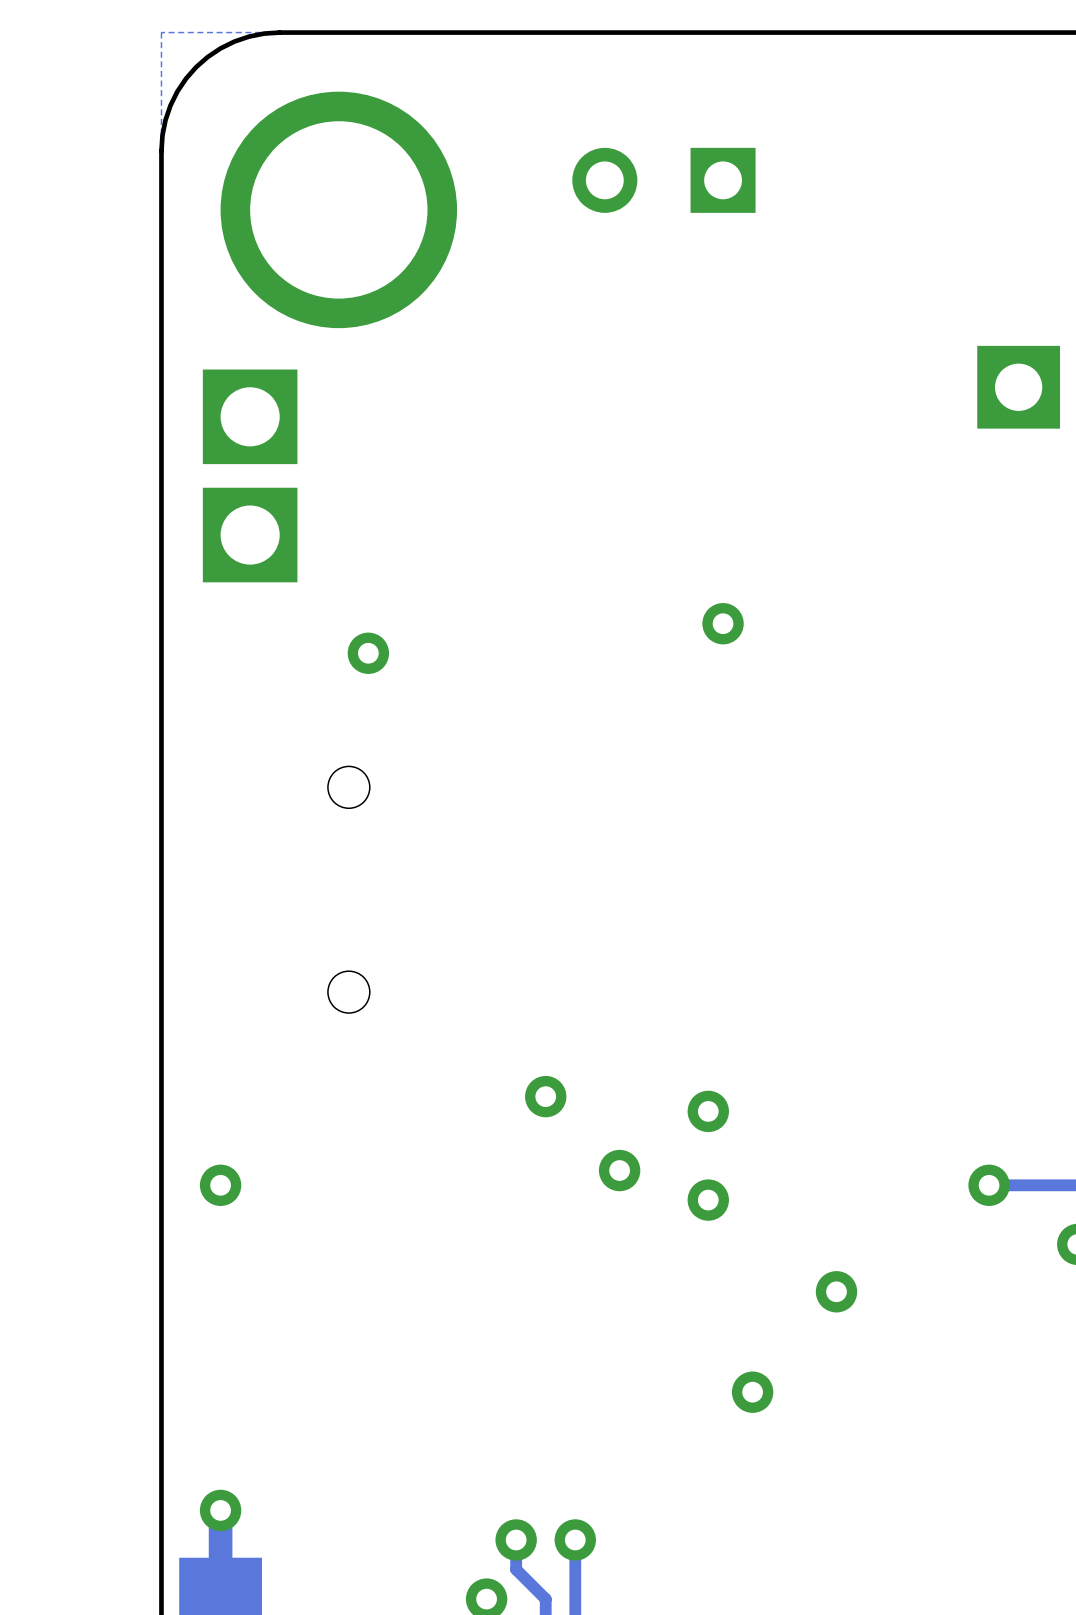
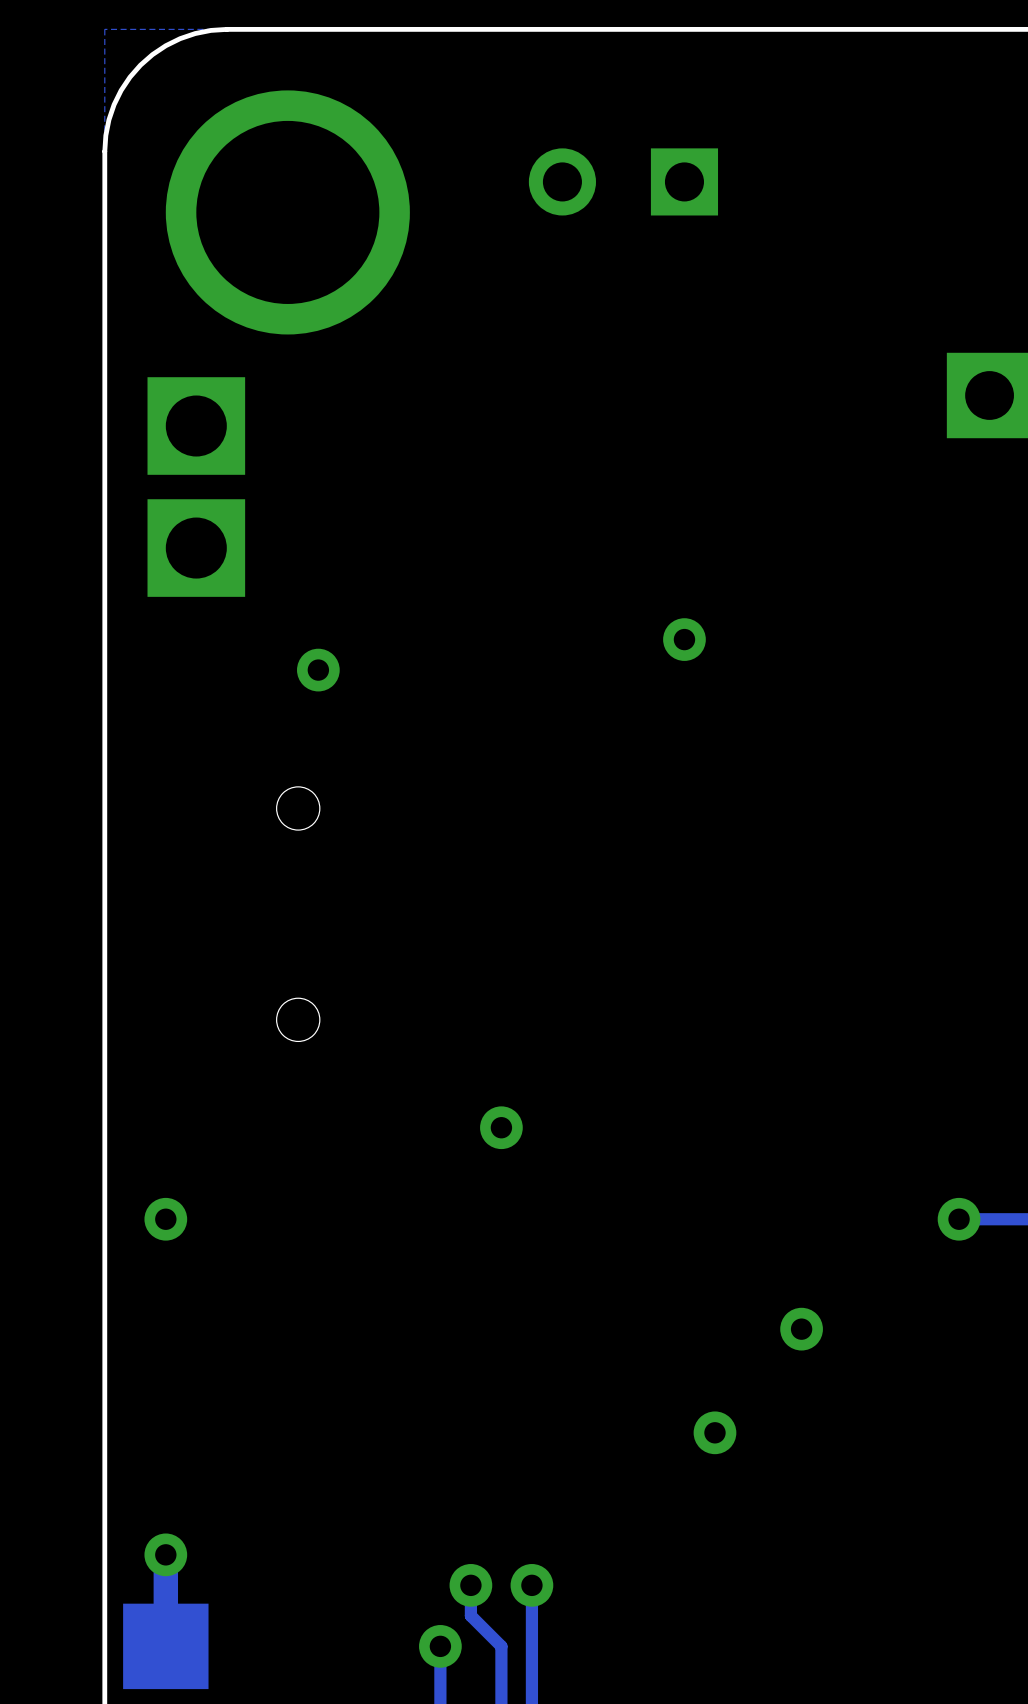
via: (708, 1111) -> none
via: (619, 1170) -> none
via: (708, 1200) -> none

